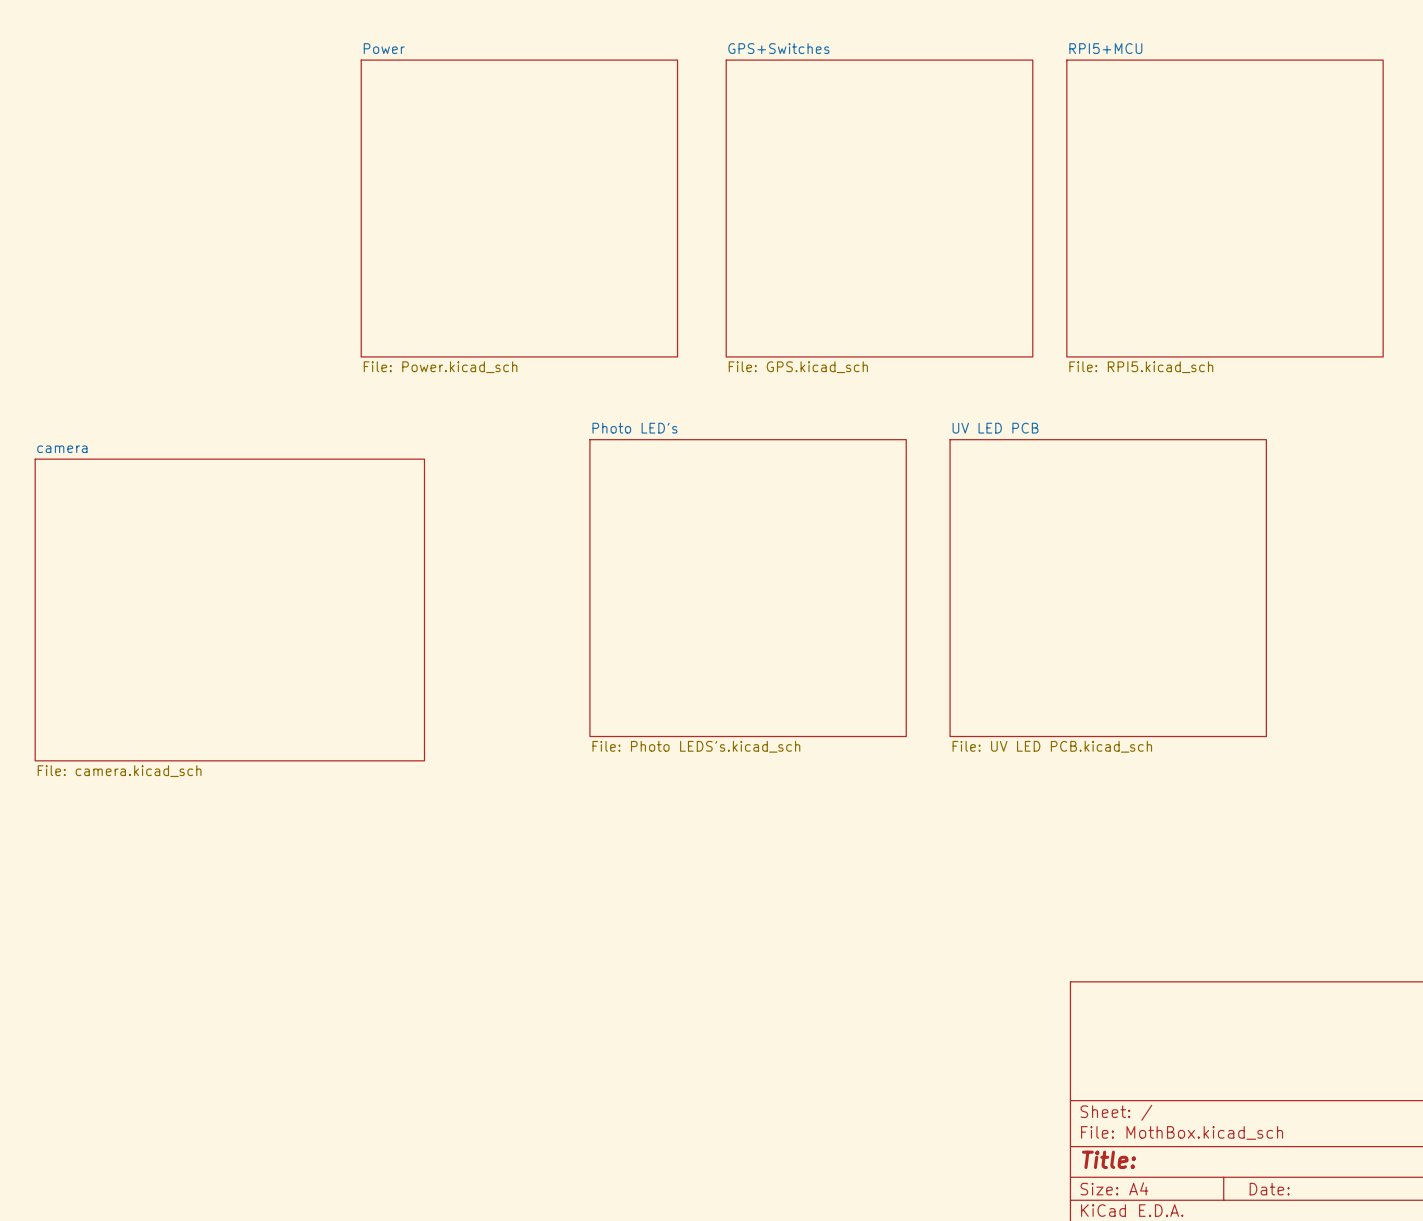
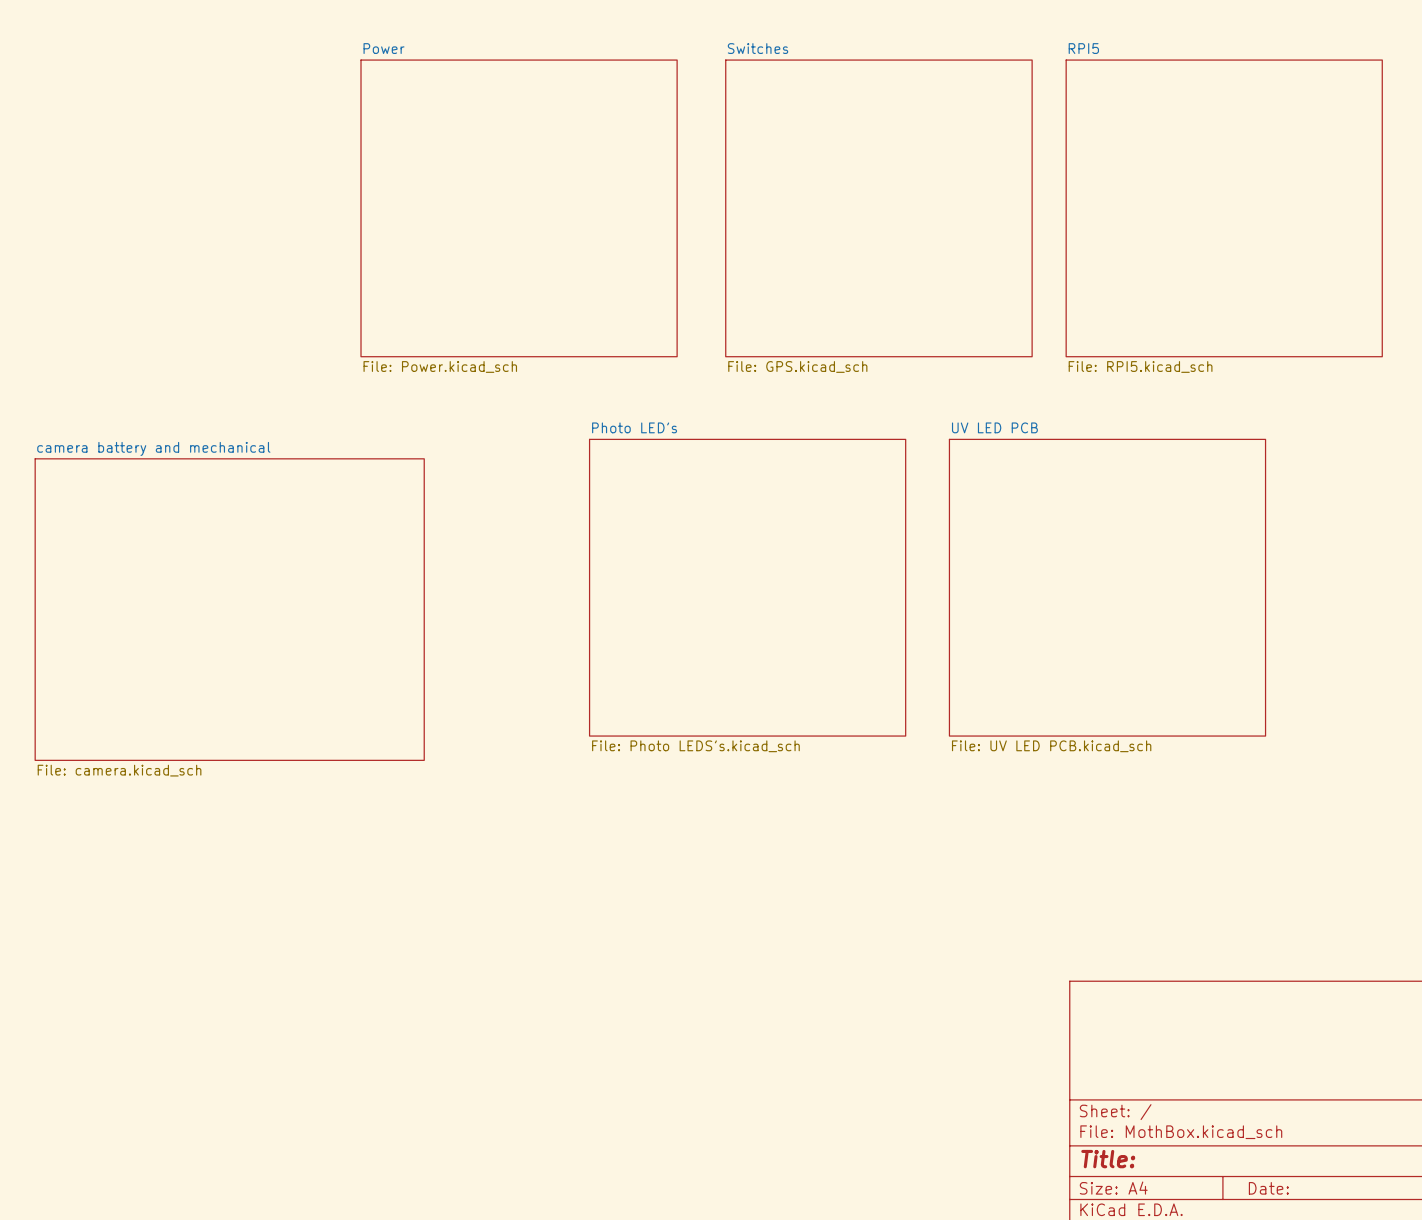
sheet GPS+Switches name: GPS+Switches (778, 48) -> Switches (758, 48)
sheet RPI5+MCU name: RPI5+MCU (1105, 48) -> RPI5 (1083, 48)
sheet camera name: camera (62, 449) -> camera battery and mechanical (153, 448)

